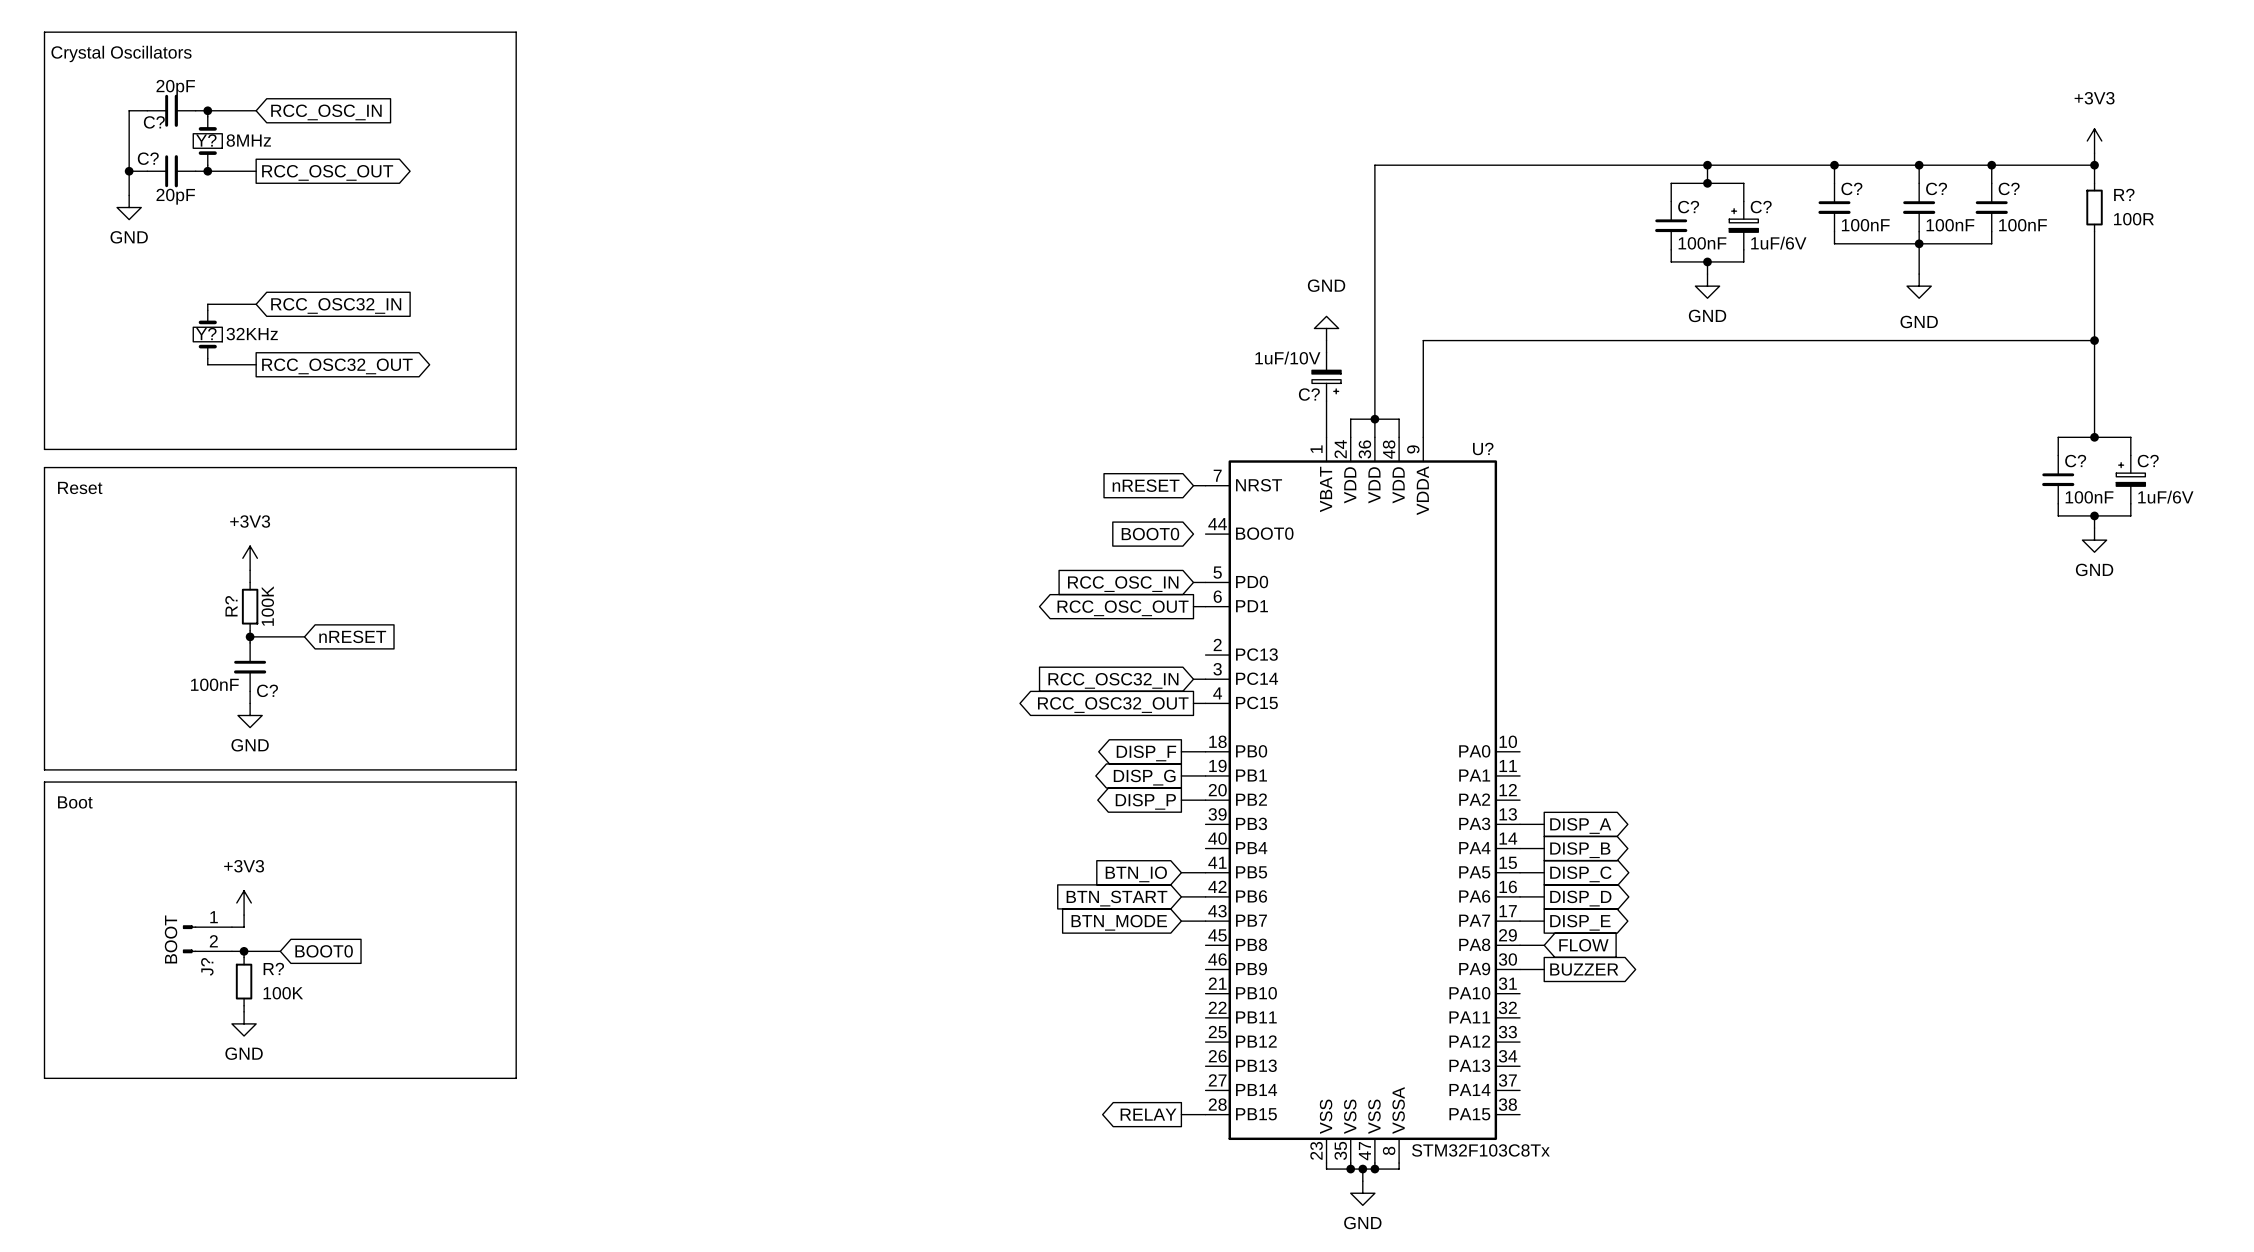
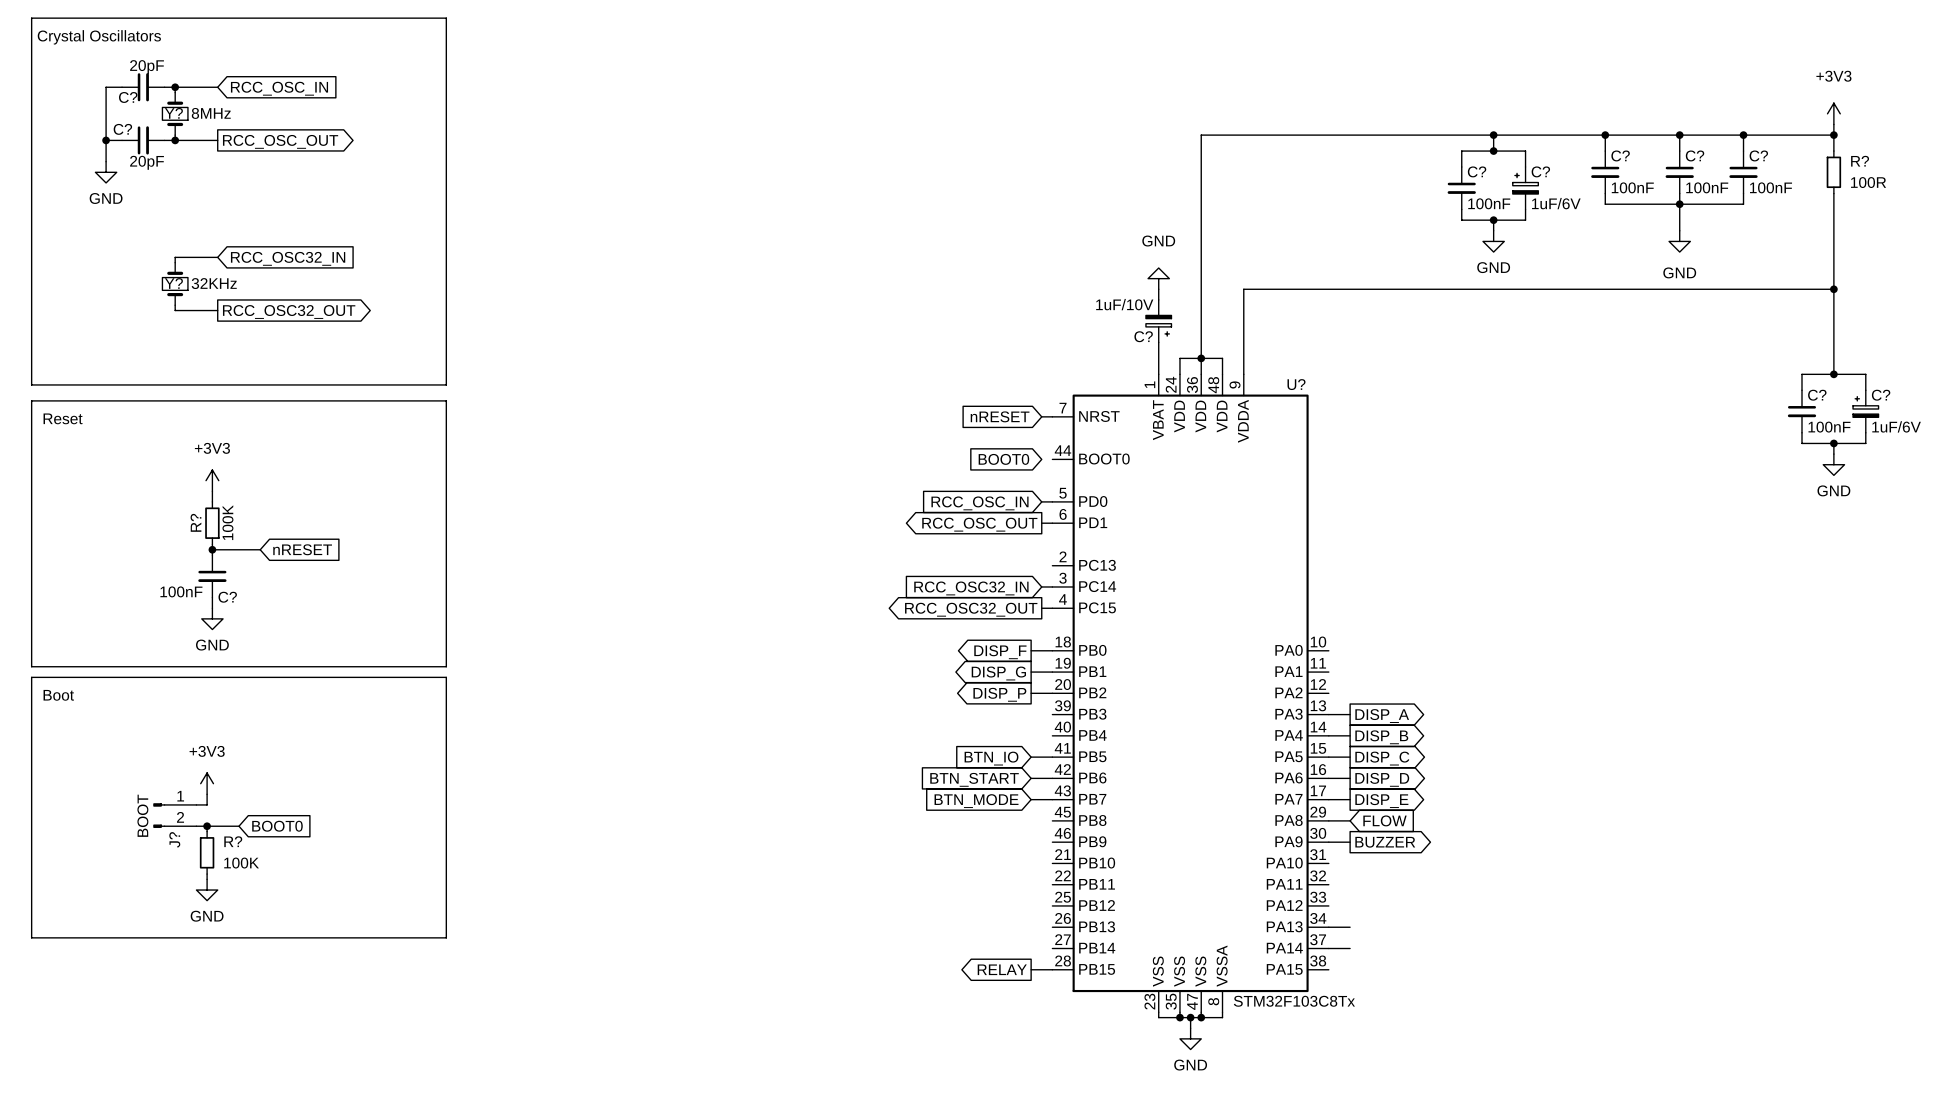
wire: none -> (1328, 927) (1350, 927)
wire: none -> (1328, 948) (1350, 948)

